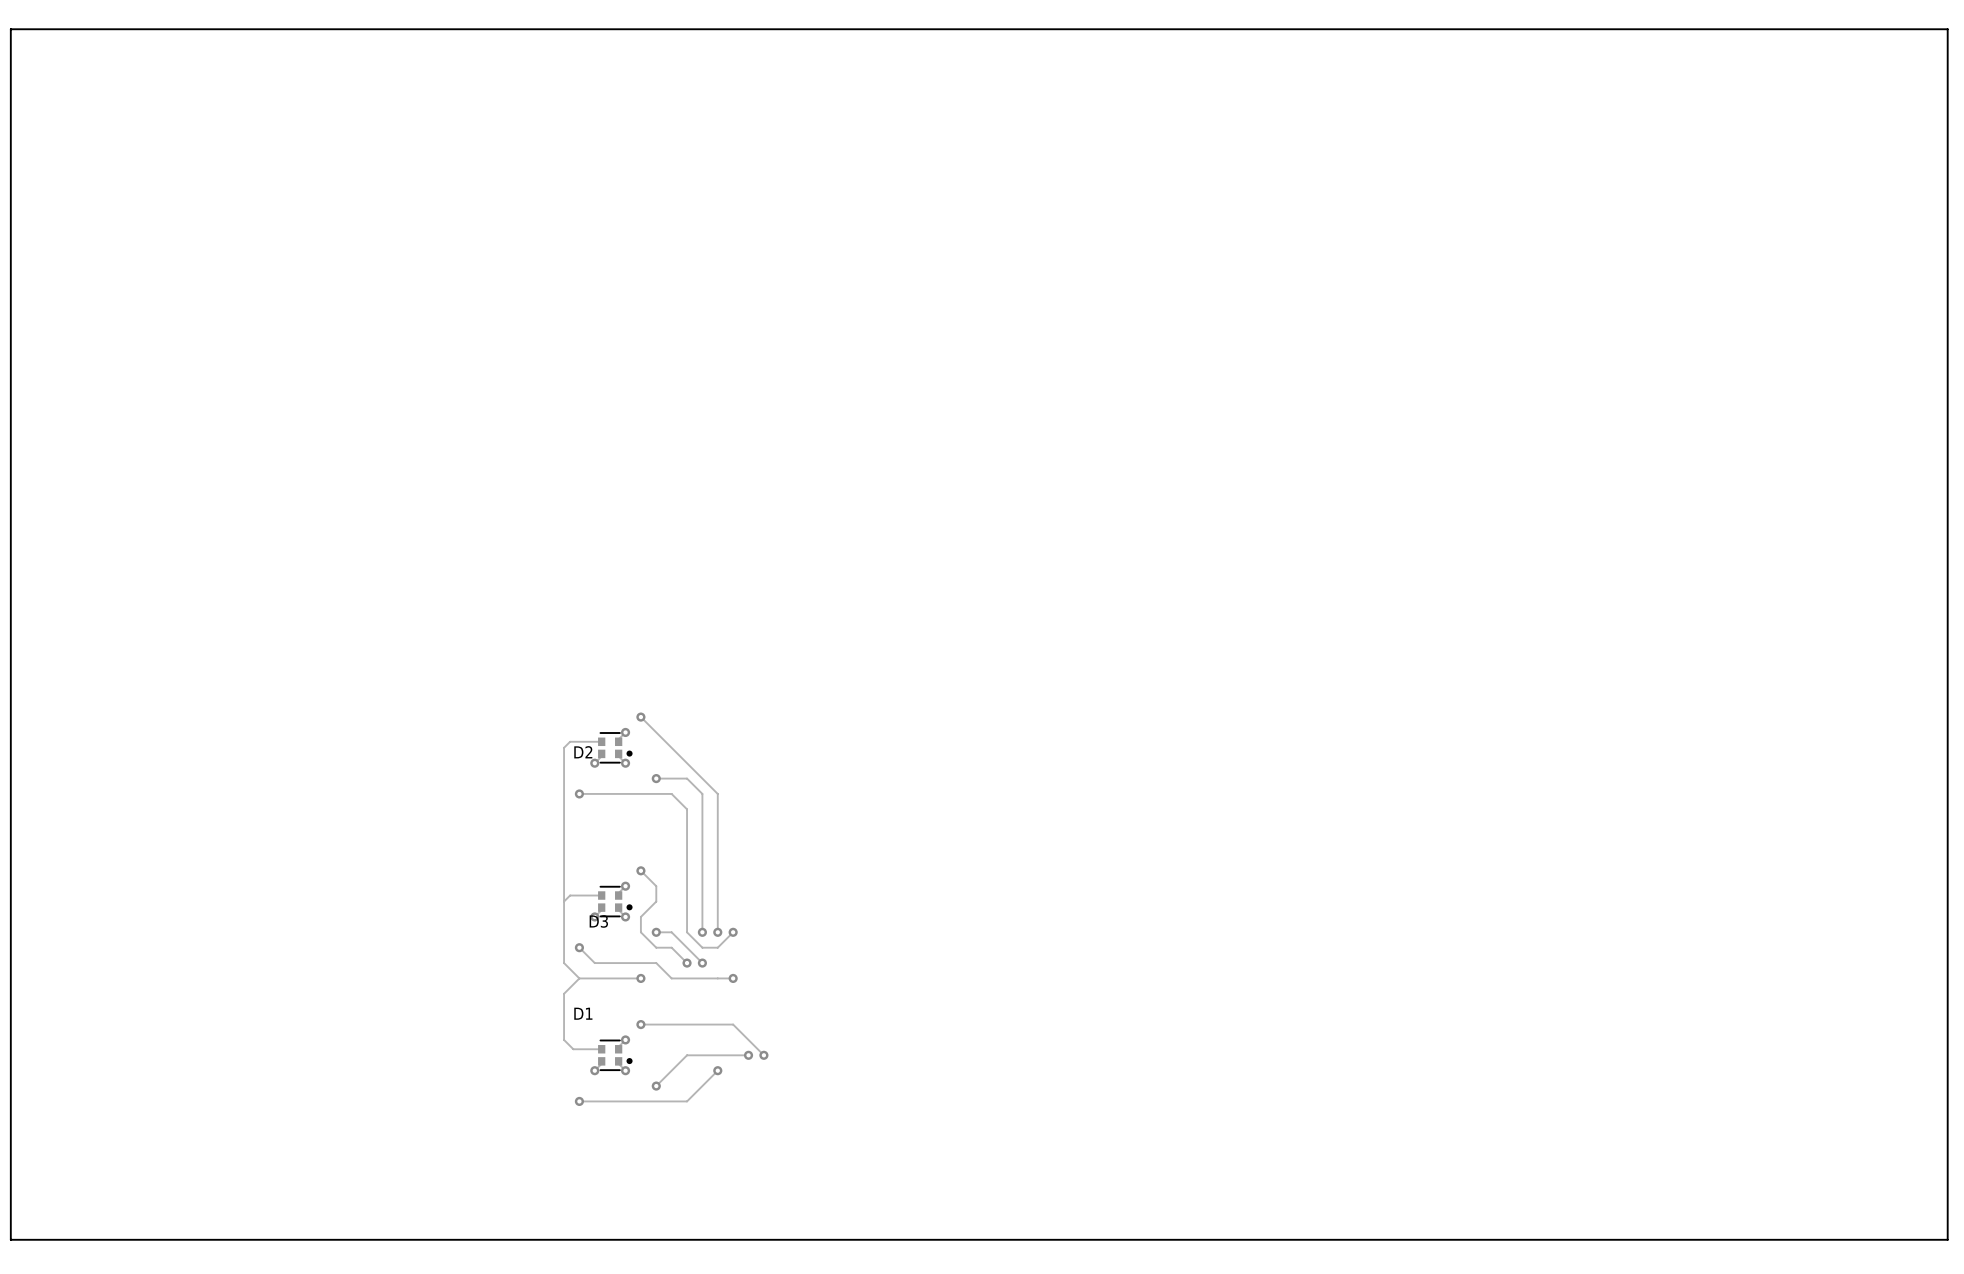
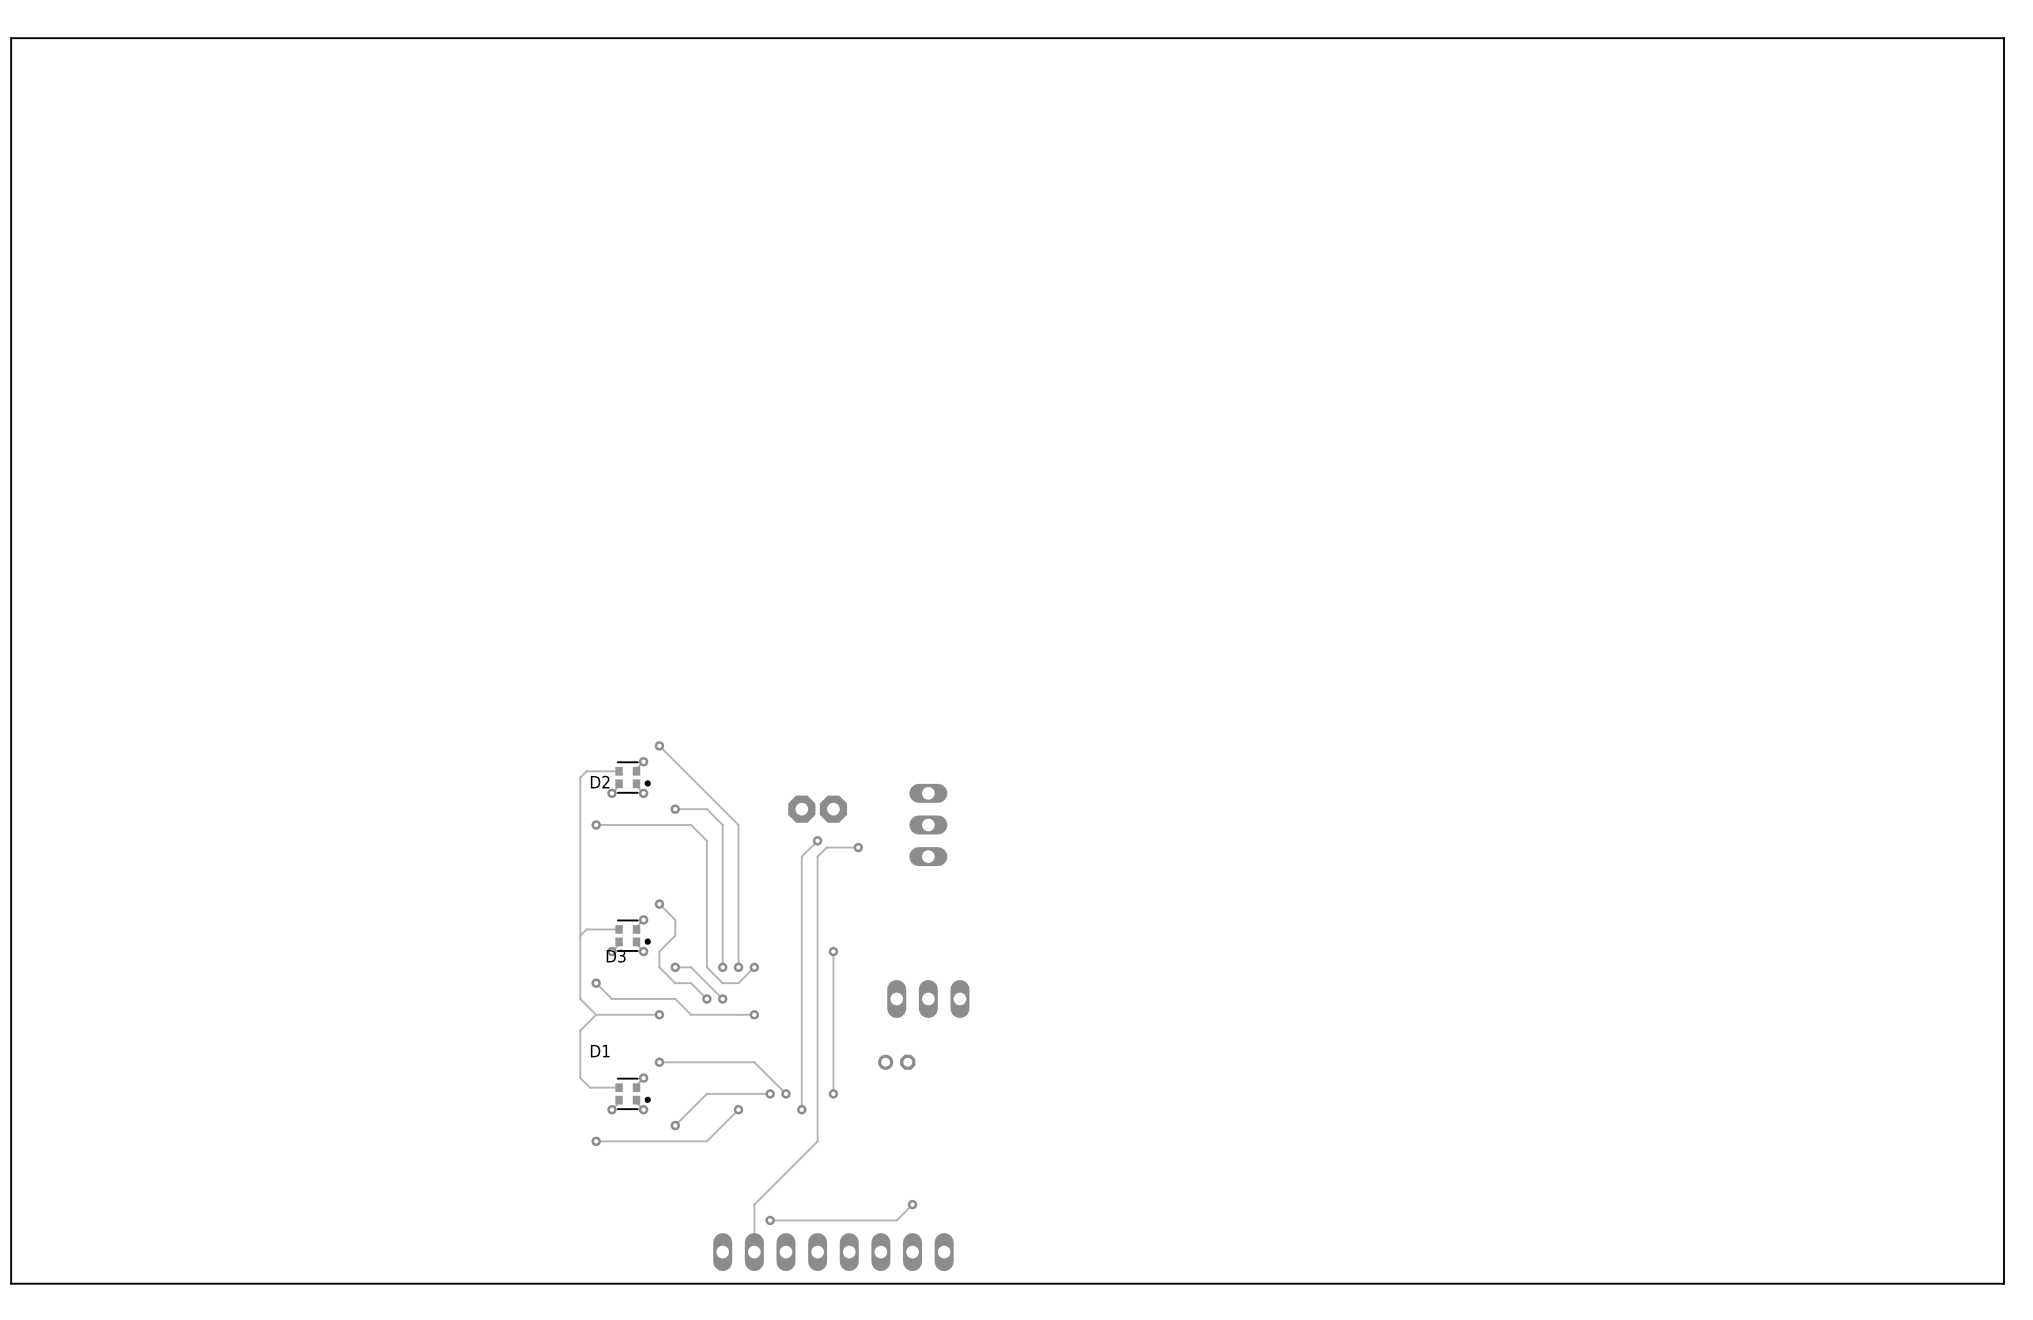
part: none -> (801, 809)
part: none -> (833, 809)
part: none -> (928, 824)
track: none -> (817, 840) (801, 856) (801, 1109)
via: none -> (817, 840)
track: none -> (858, 847) (826, 847) (817, 856) (817, 1141) (754, 1204) (754, 1252)
via: none -> (858, 847)
track: none -> (833, 951) (833, 1093)
via: none -> (833, 951)
part: none -> (928, 998)
part: none -> (896, 1062)
via: none -> (833, 1093)
via: none -> (801, 1109)
track: none -> (912, 1204) (896, 1220) (770, 1220)
via: none -> (912, 1204)
via: none -> (770, 1220)
part: none -> (833, 1252)

